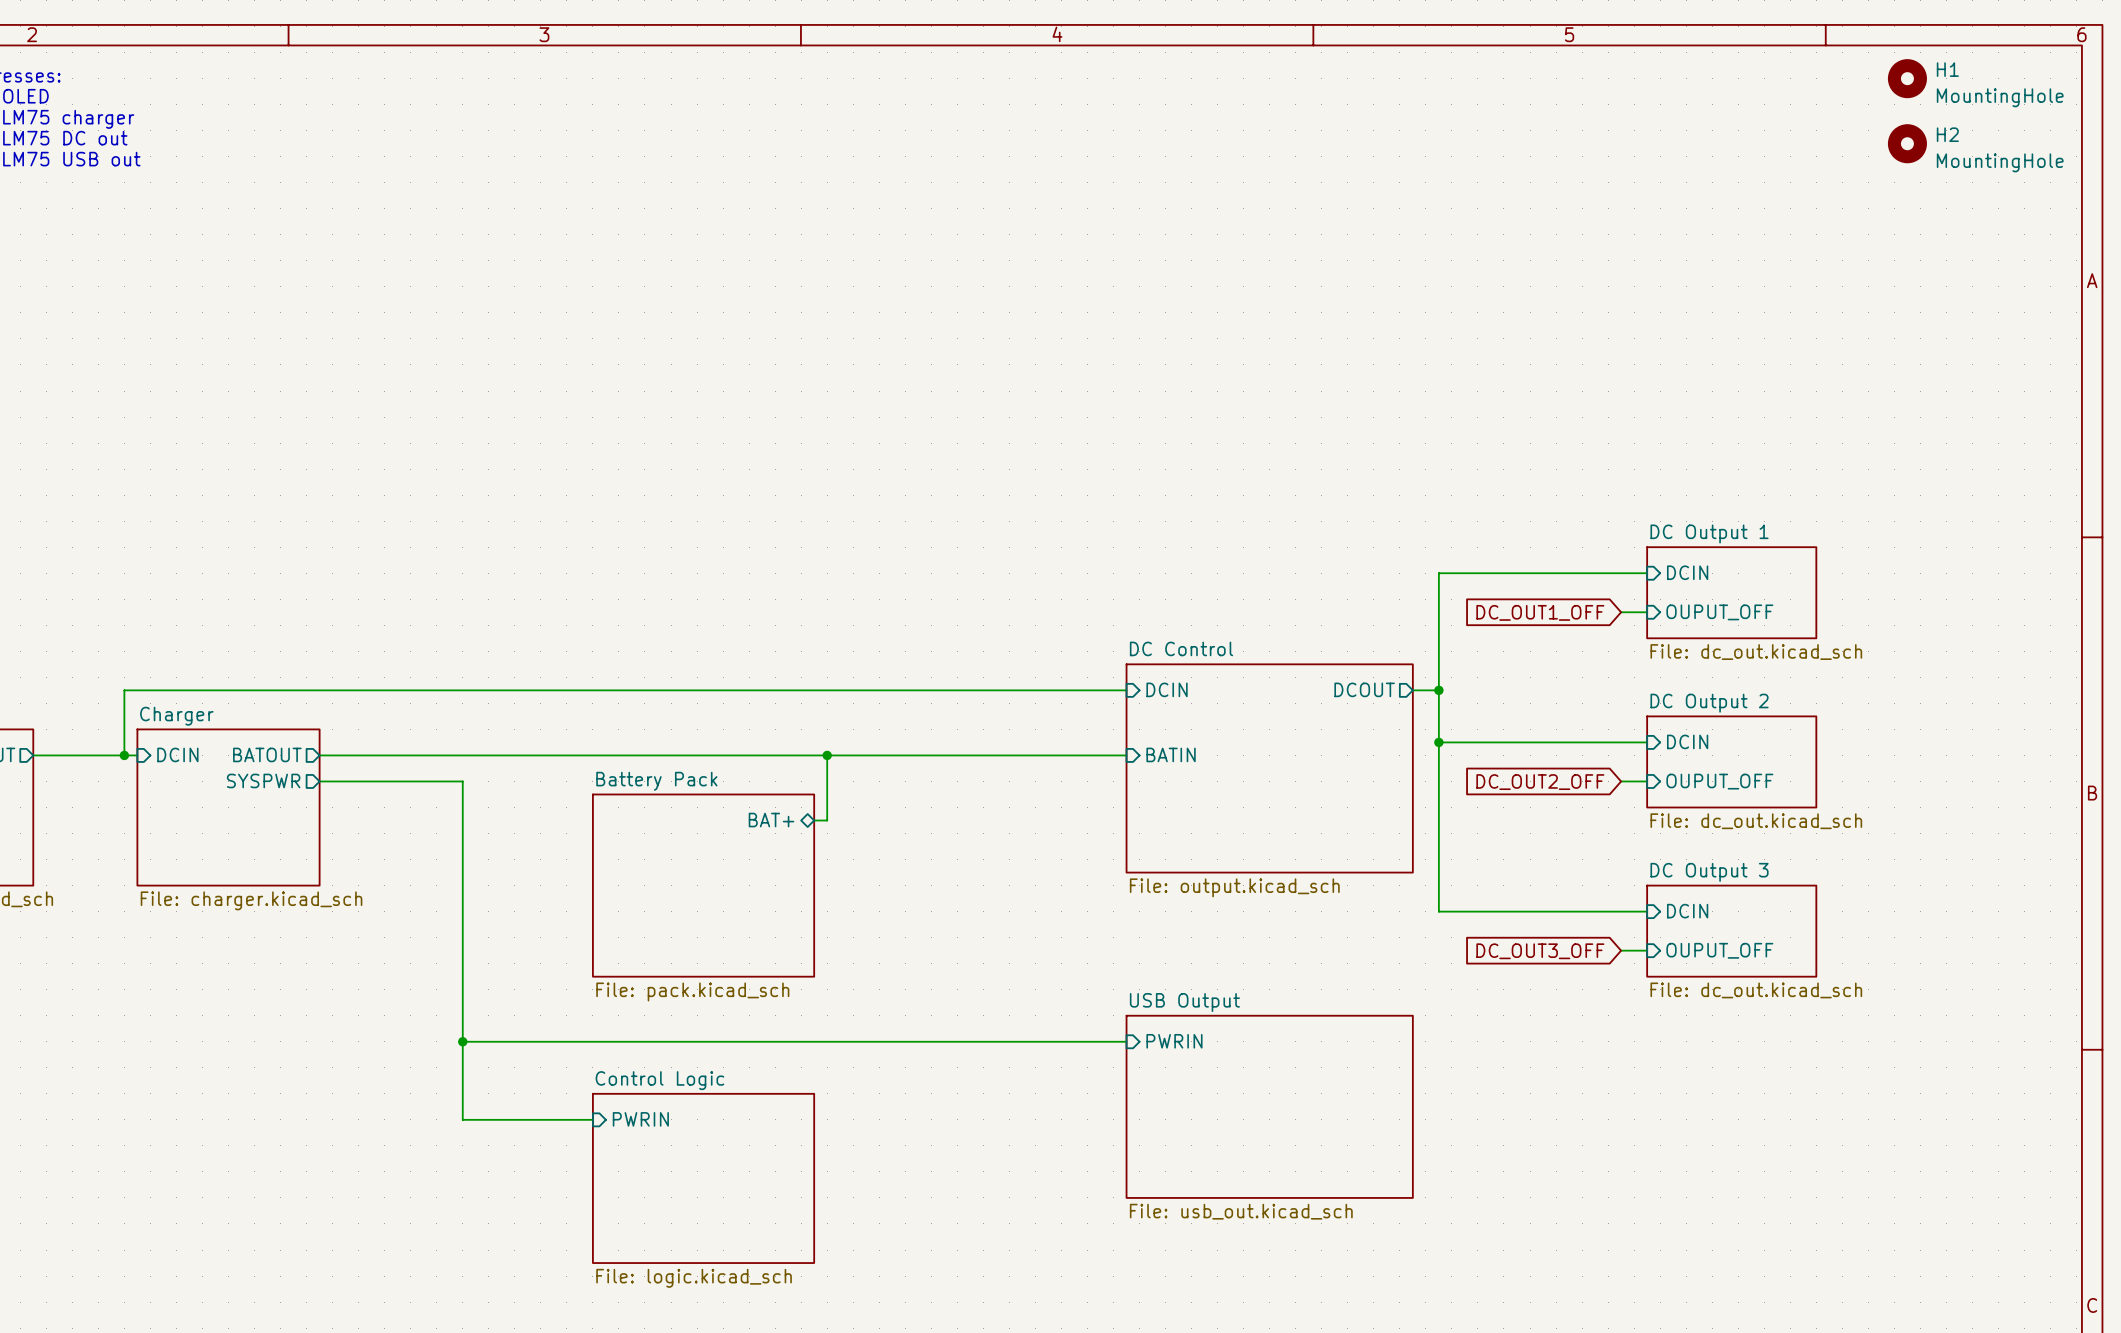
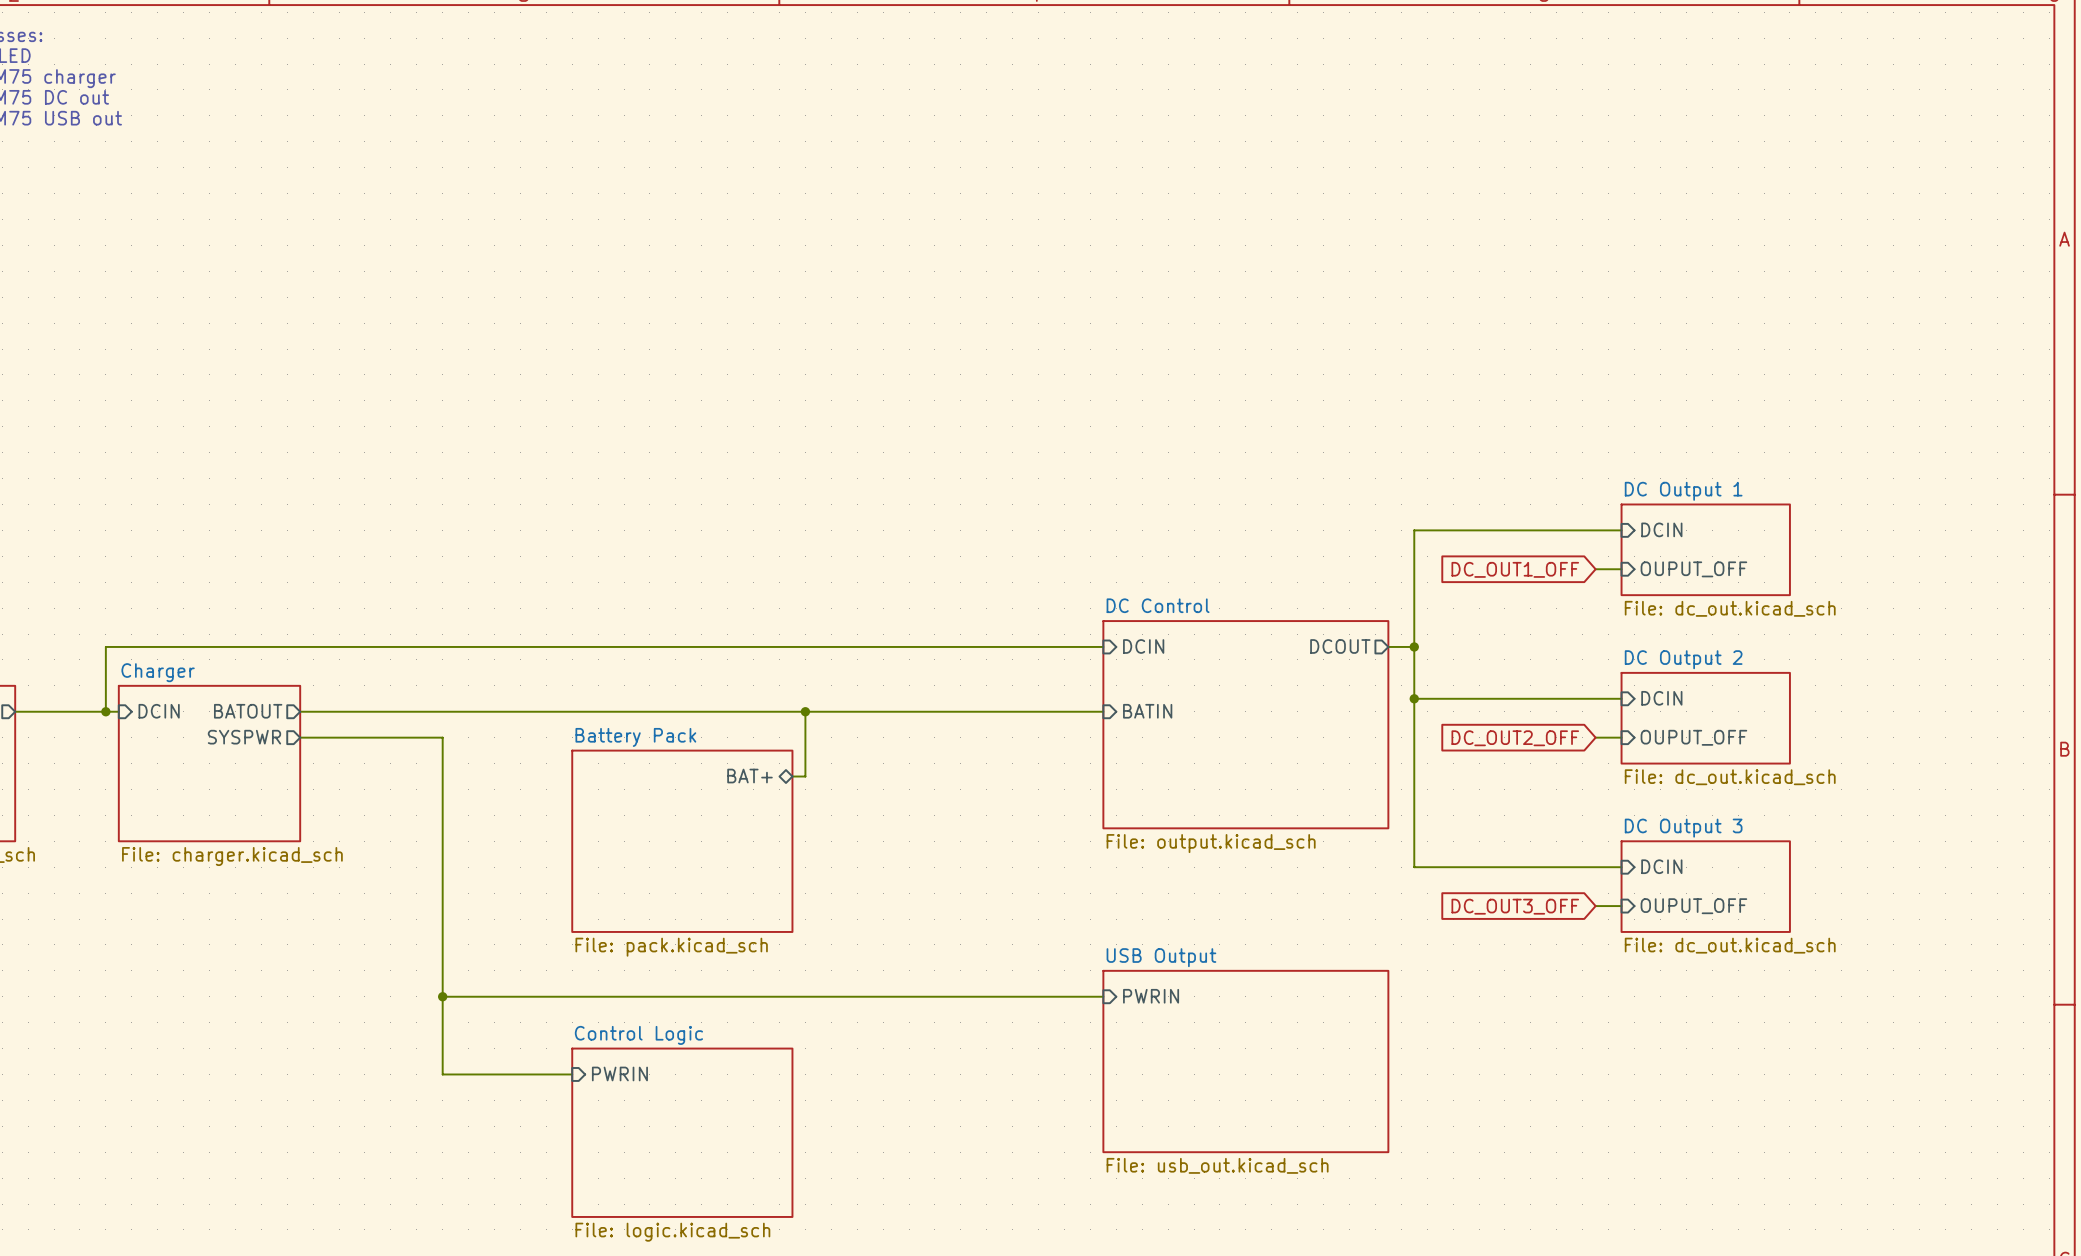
H1: MountingHole (1907, 78) -> none
H2: MountingHole (1907, 143) -> none

